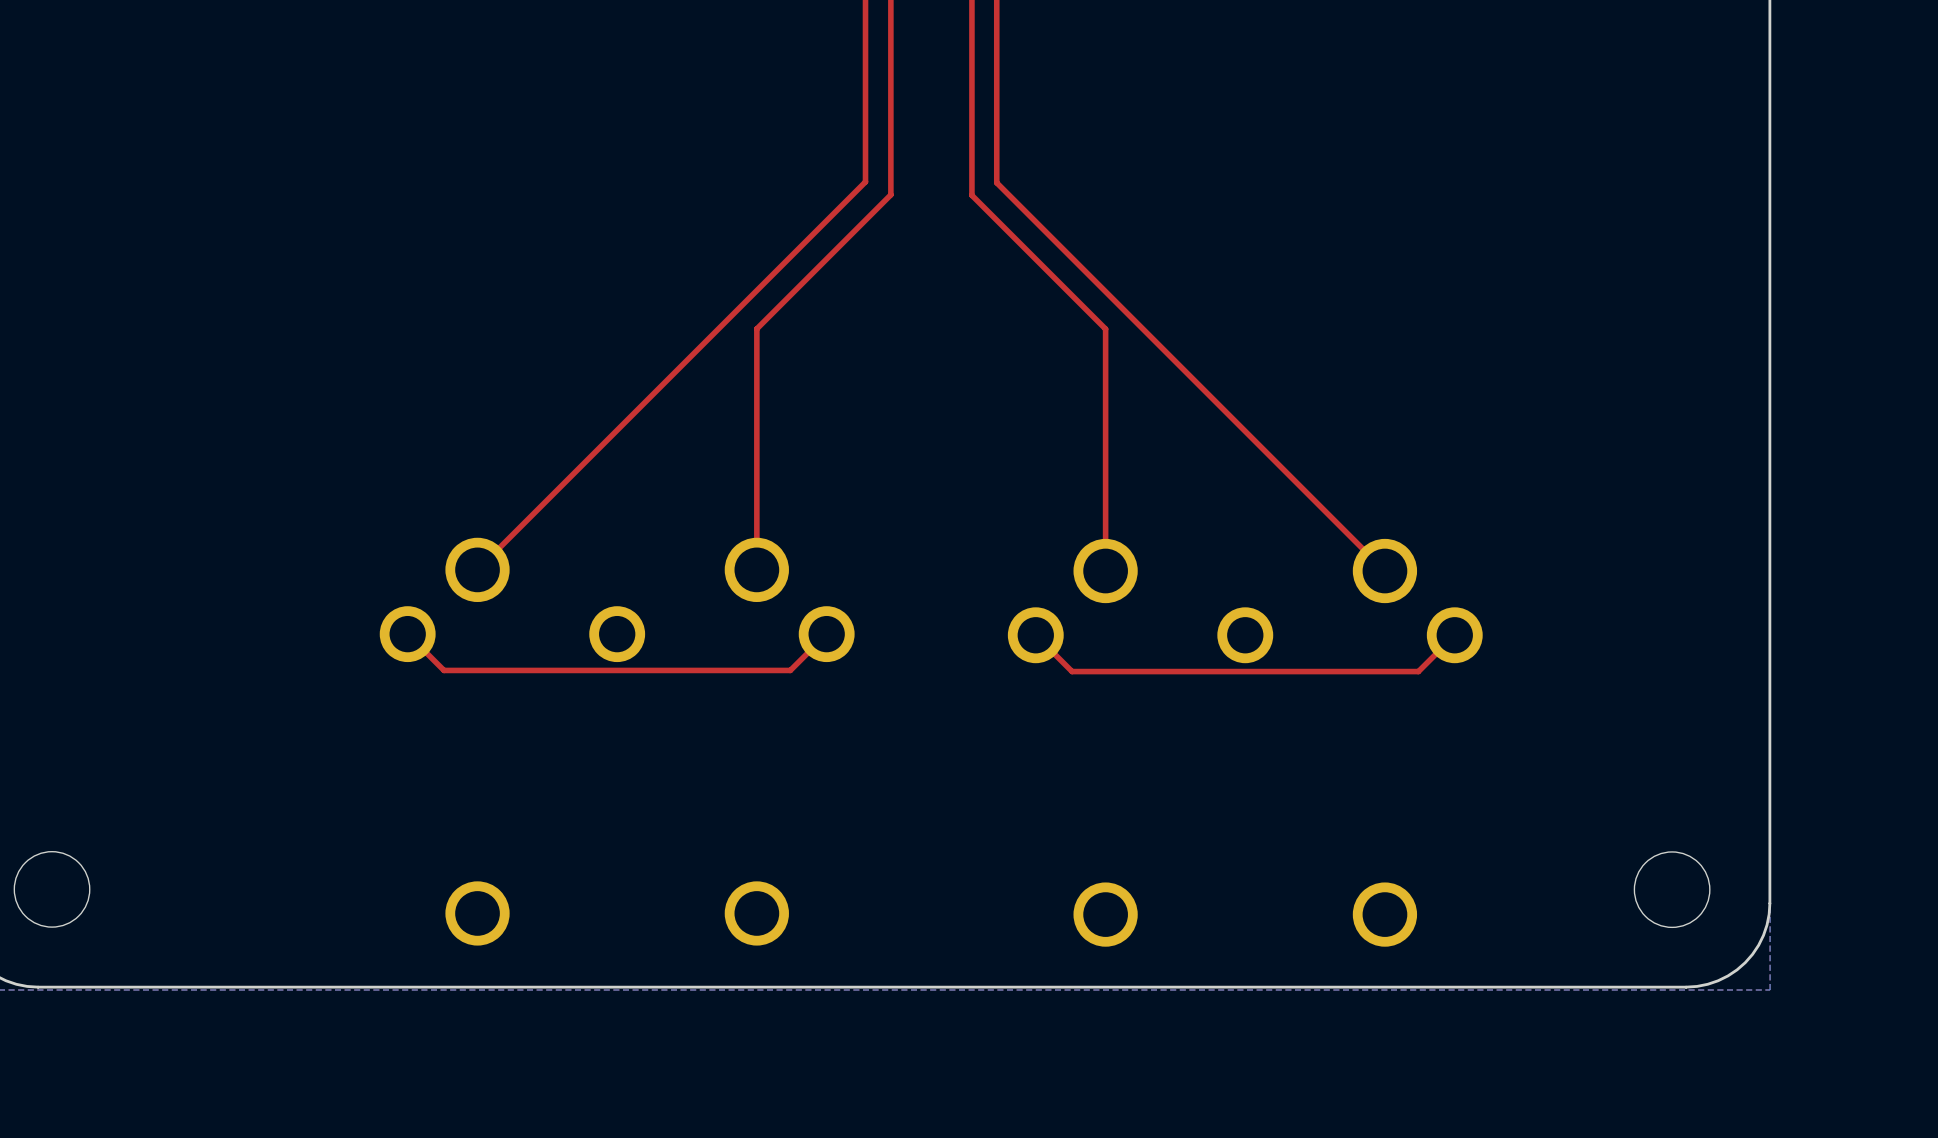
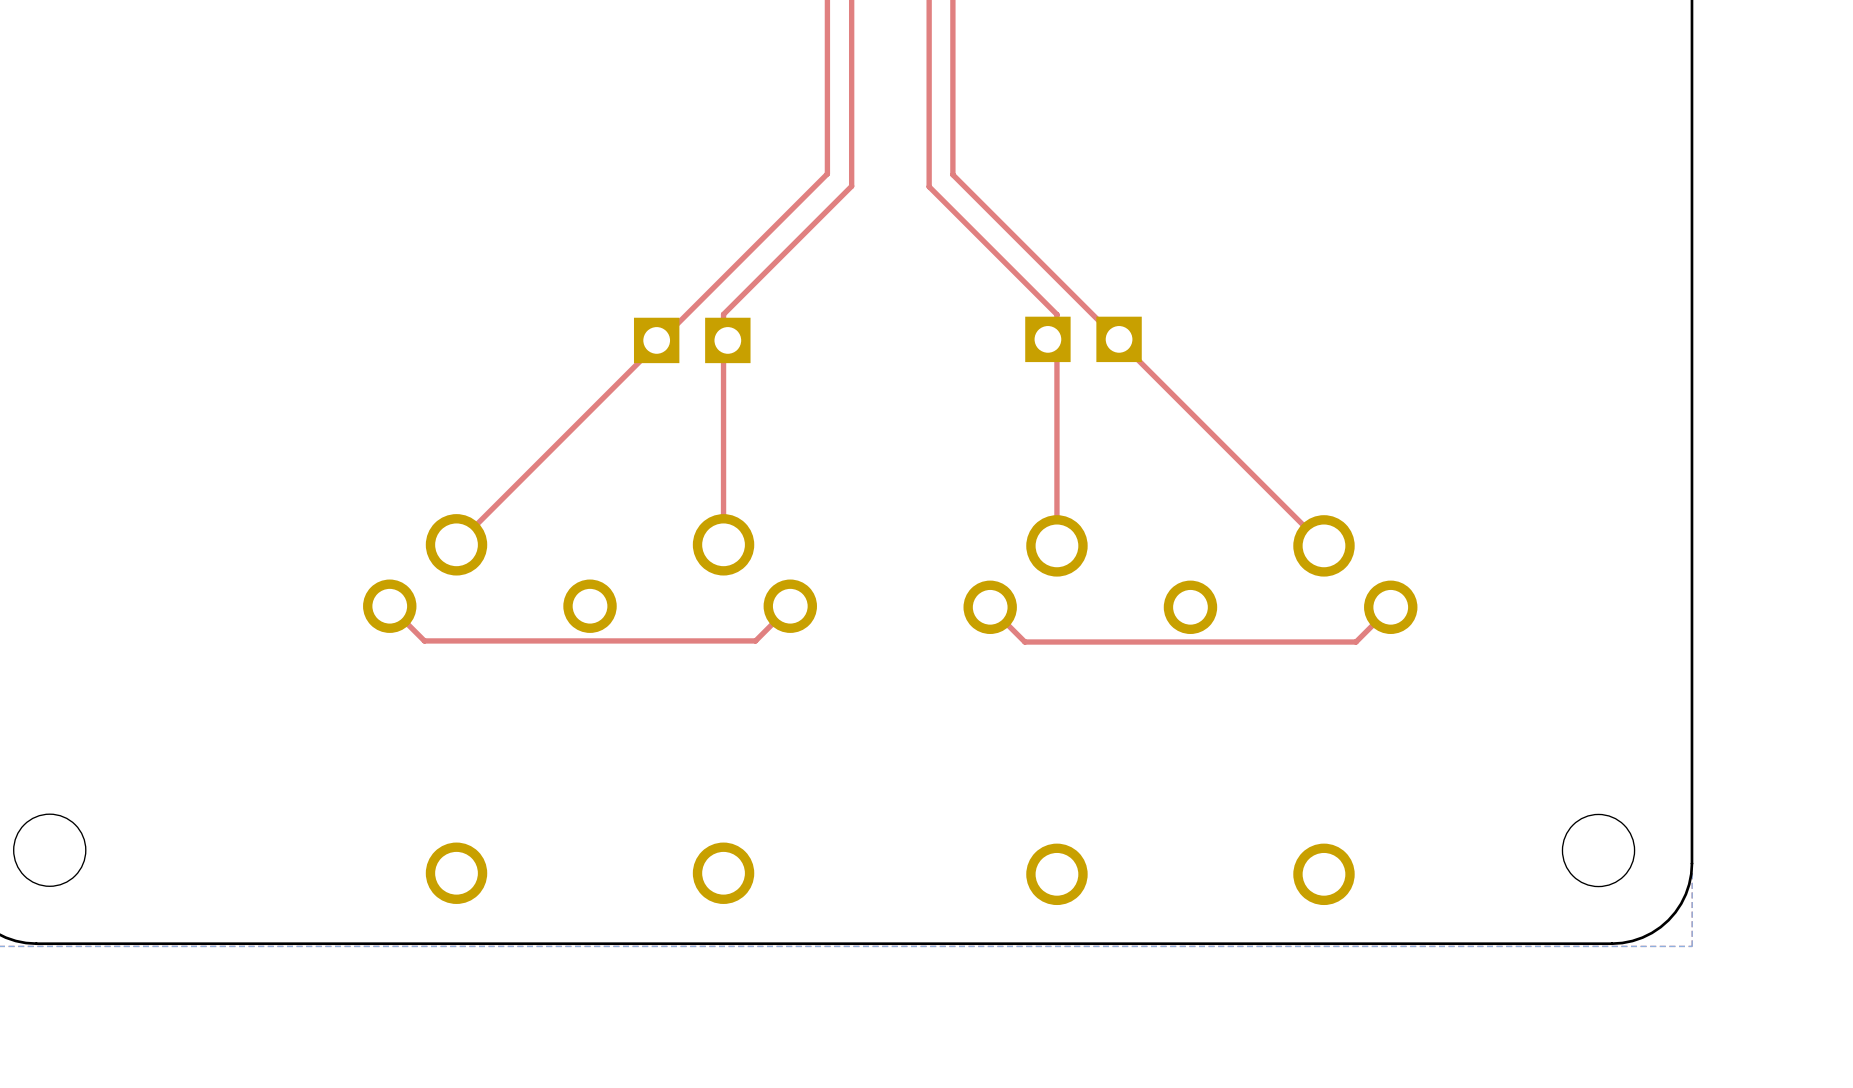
part: none -> (1047, 339)
part: none -> (1119, 339)
part: none -> (656, 340)
part: none -> (727, 340)

